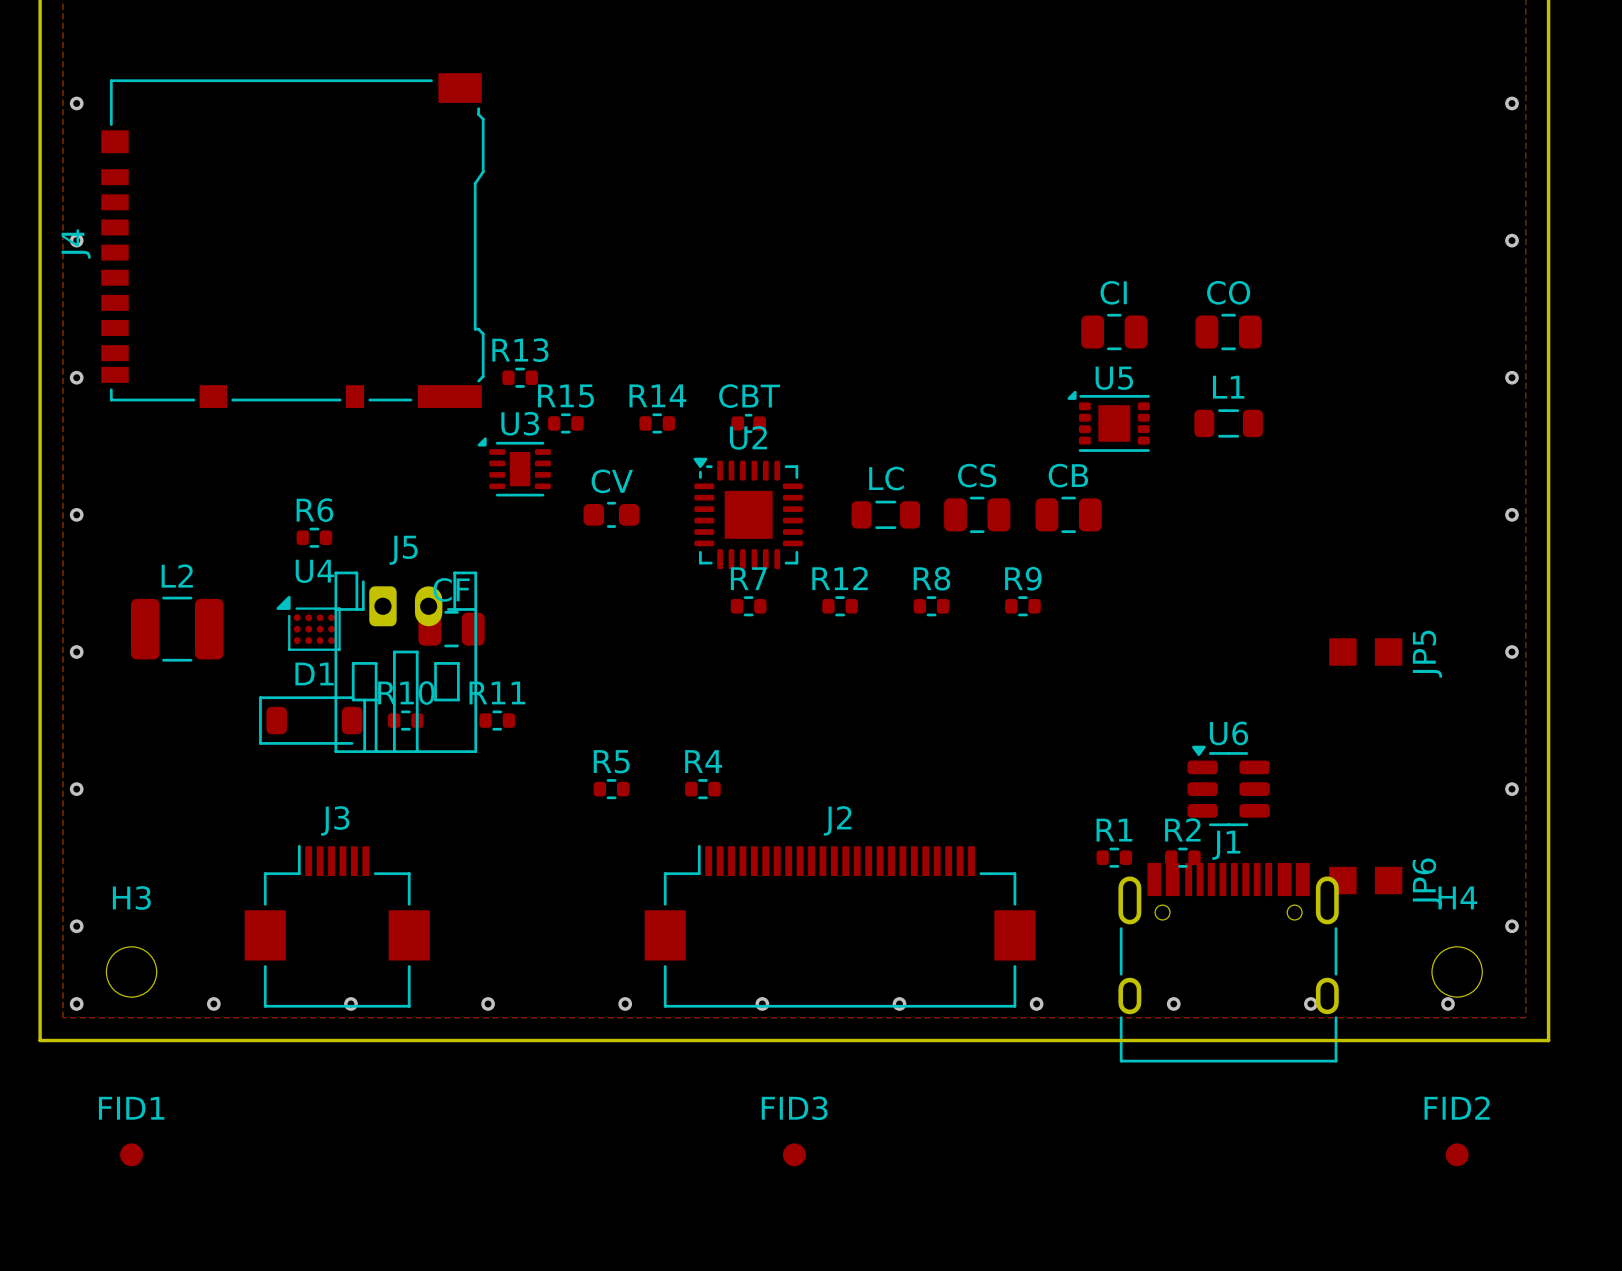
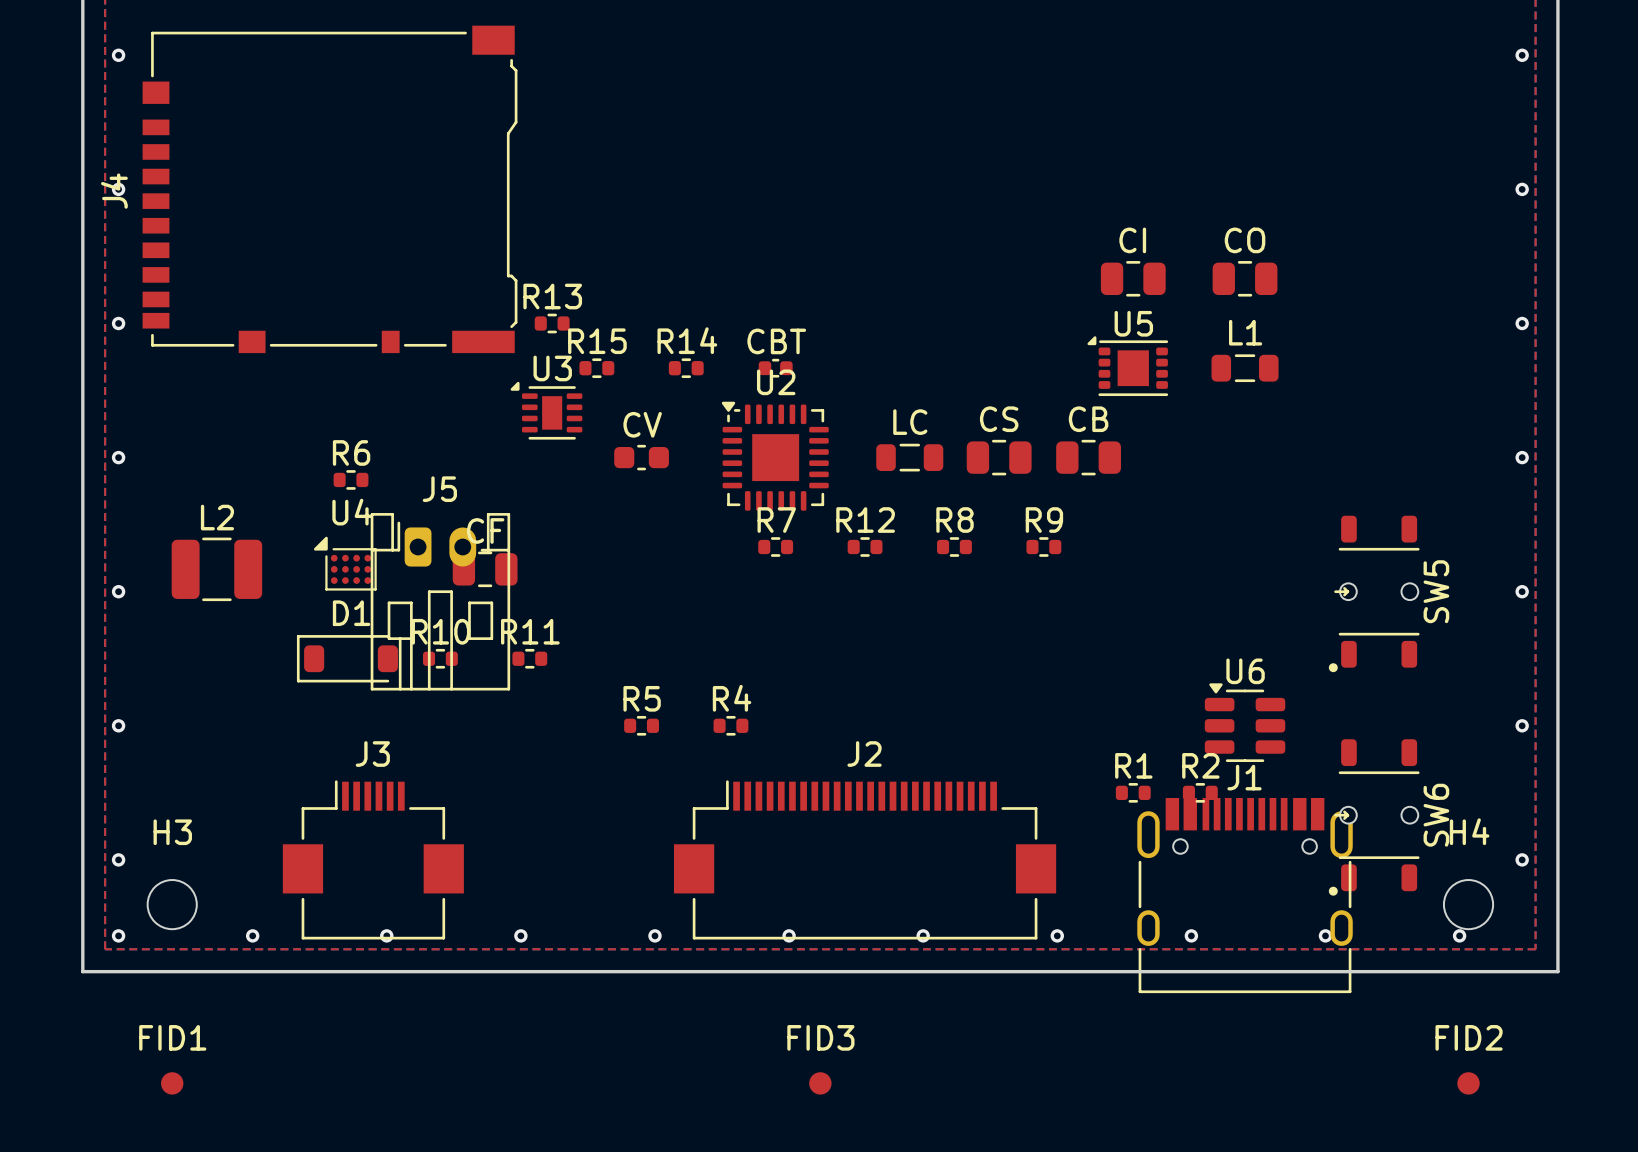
JP5: (1365, 651) -> none
SW5: none -> (1374, 593)
JP6: (1365, 880) -> none
SW6: none -> (1374, 817)

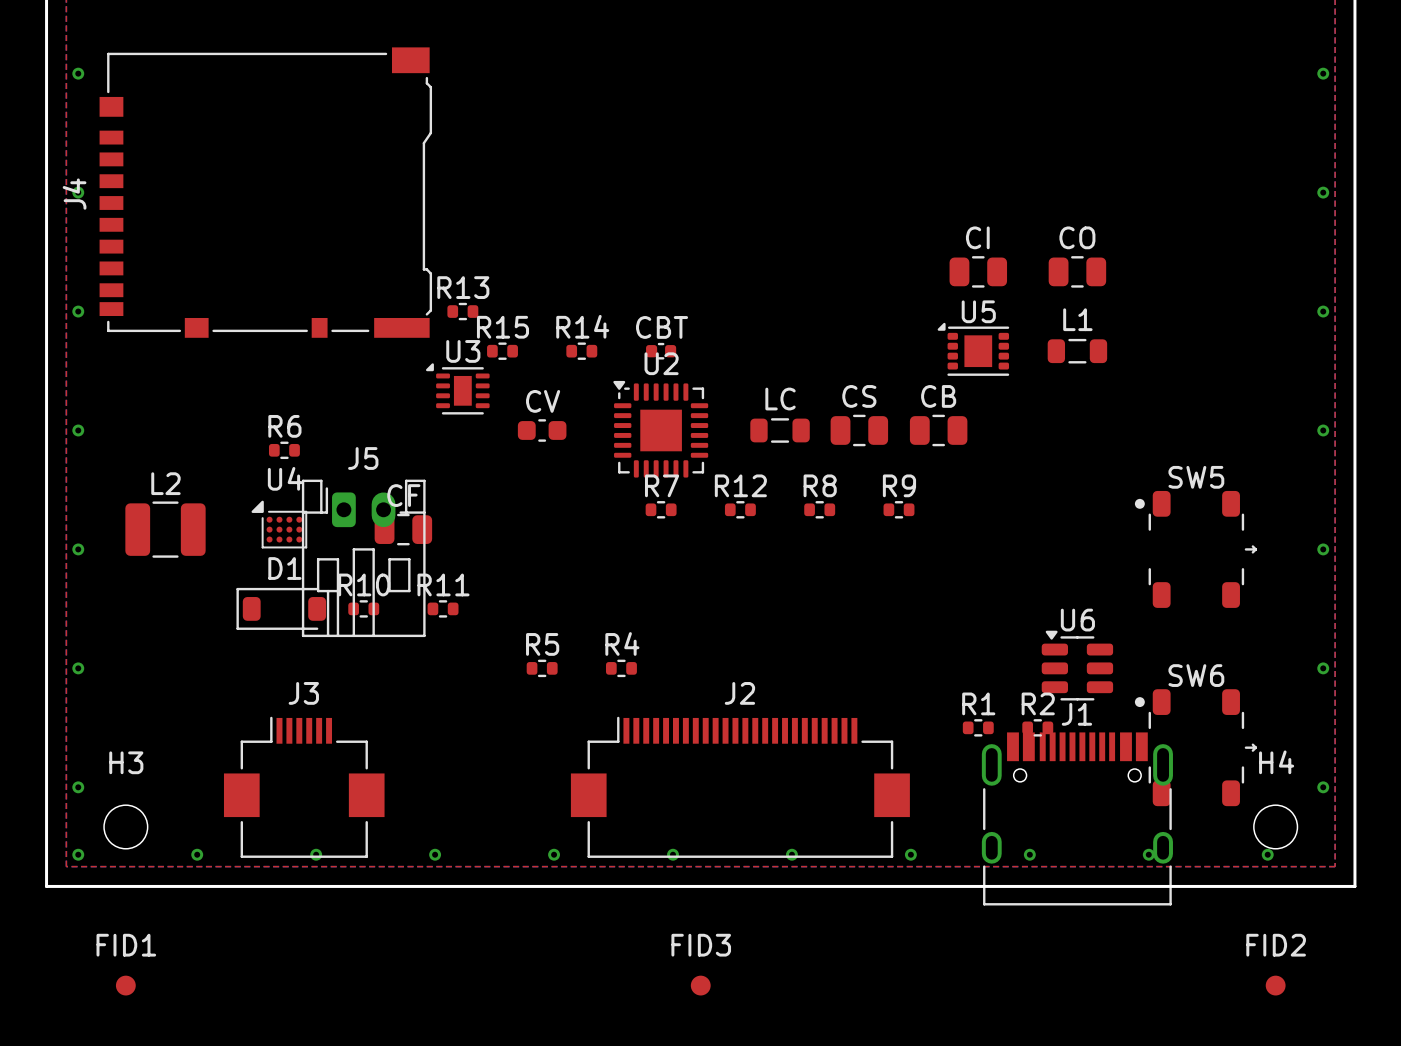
SW5 footprint: [1328, 515, 1420, 673] -> [1134, 490, 1258, 608]
SW5 name position: SW5 (1436, 591) -> SW5 (1196, 477)
SW6 footprint: [1328, 739, 1420, 896] -> [1134, 689, 1258, 807]
SW6 name position: SW6 (1436, 815) -> SW6 (1196, 675)

